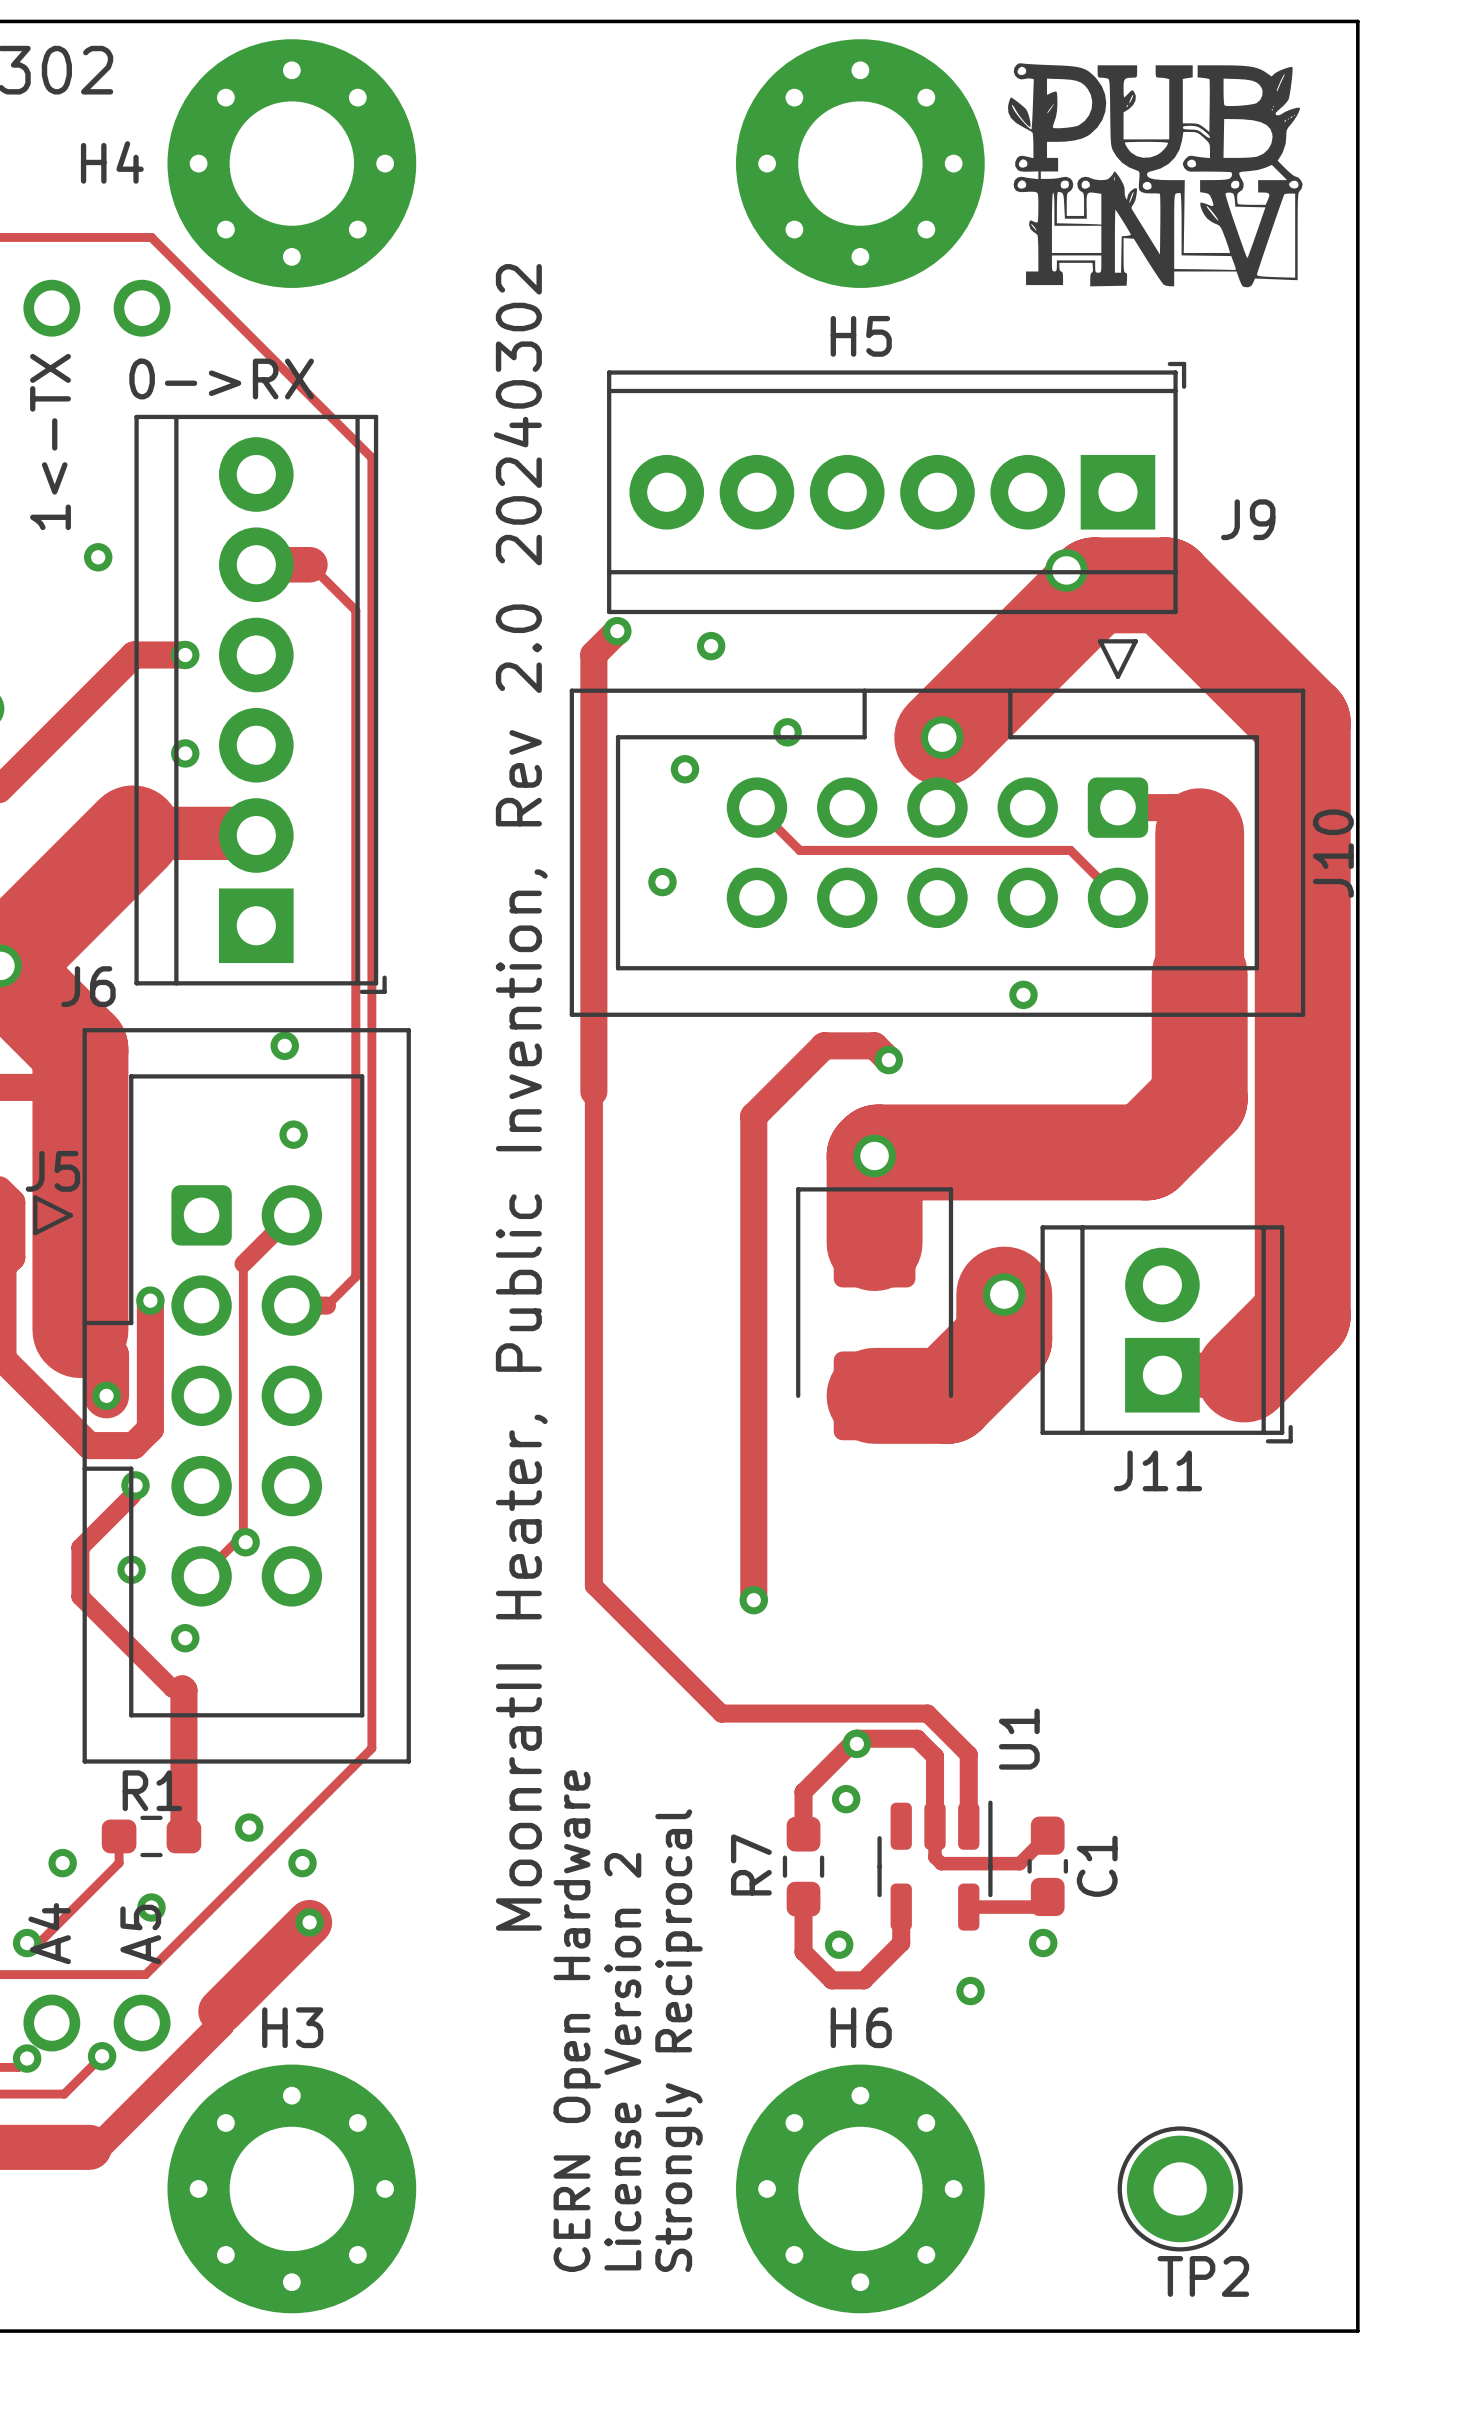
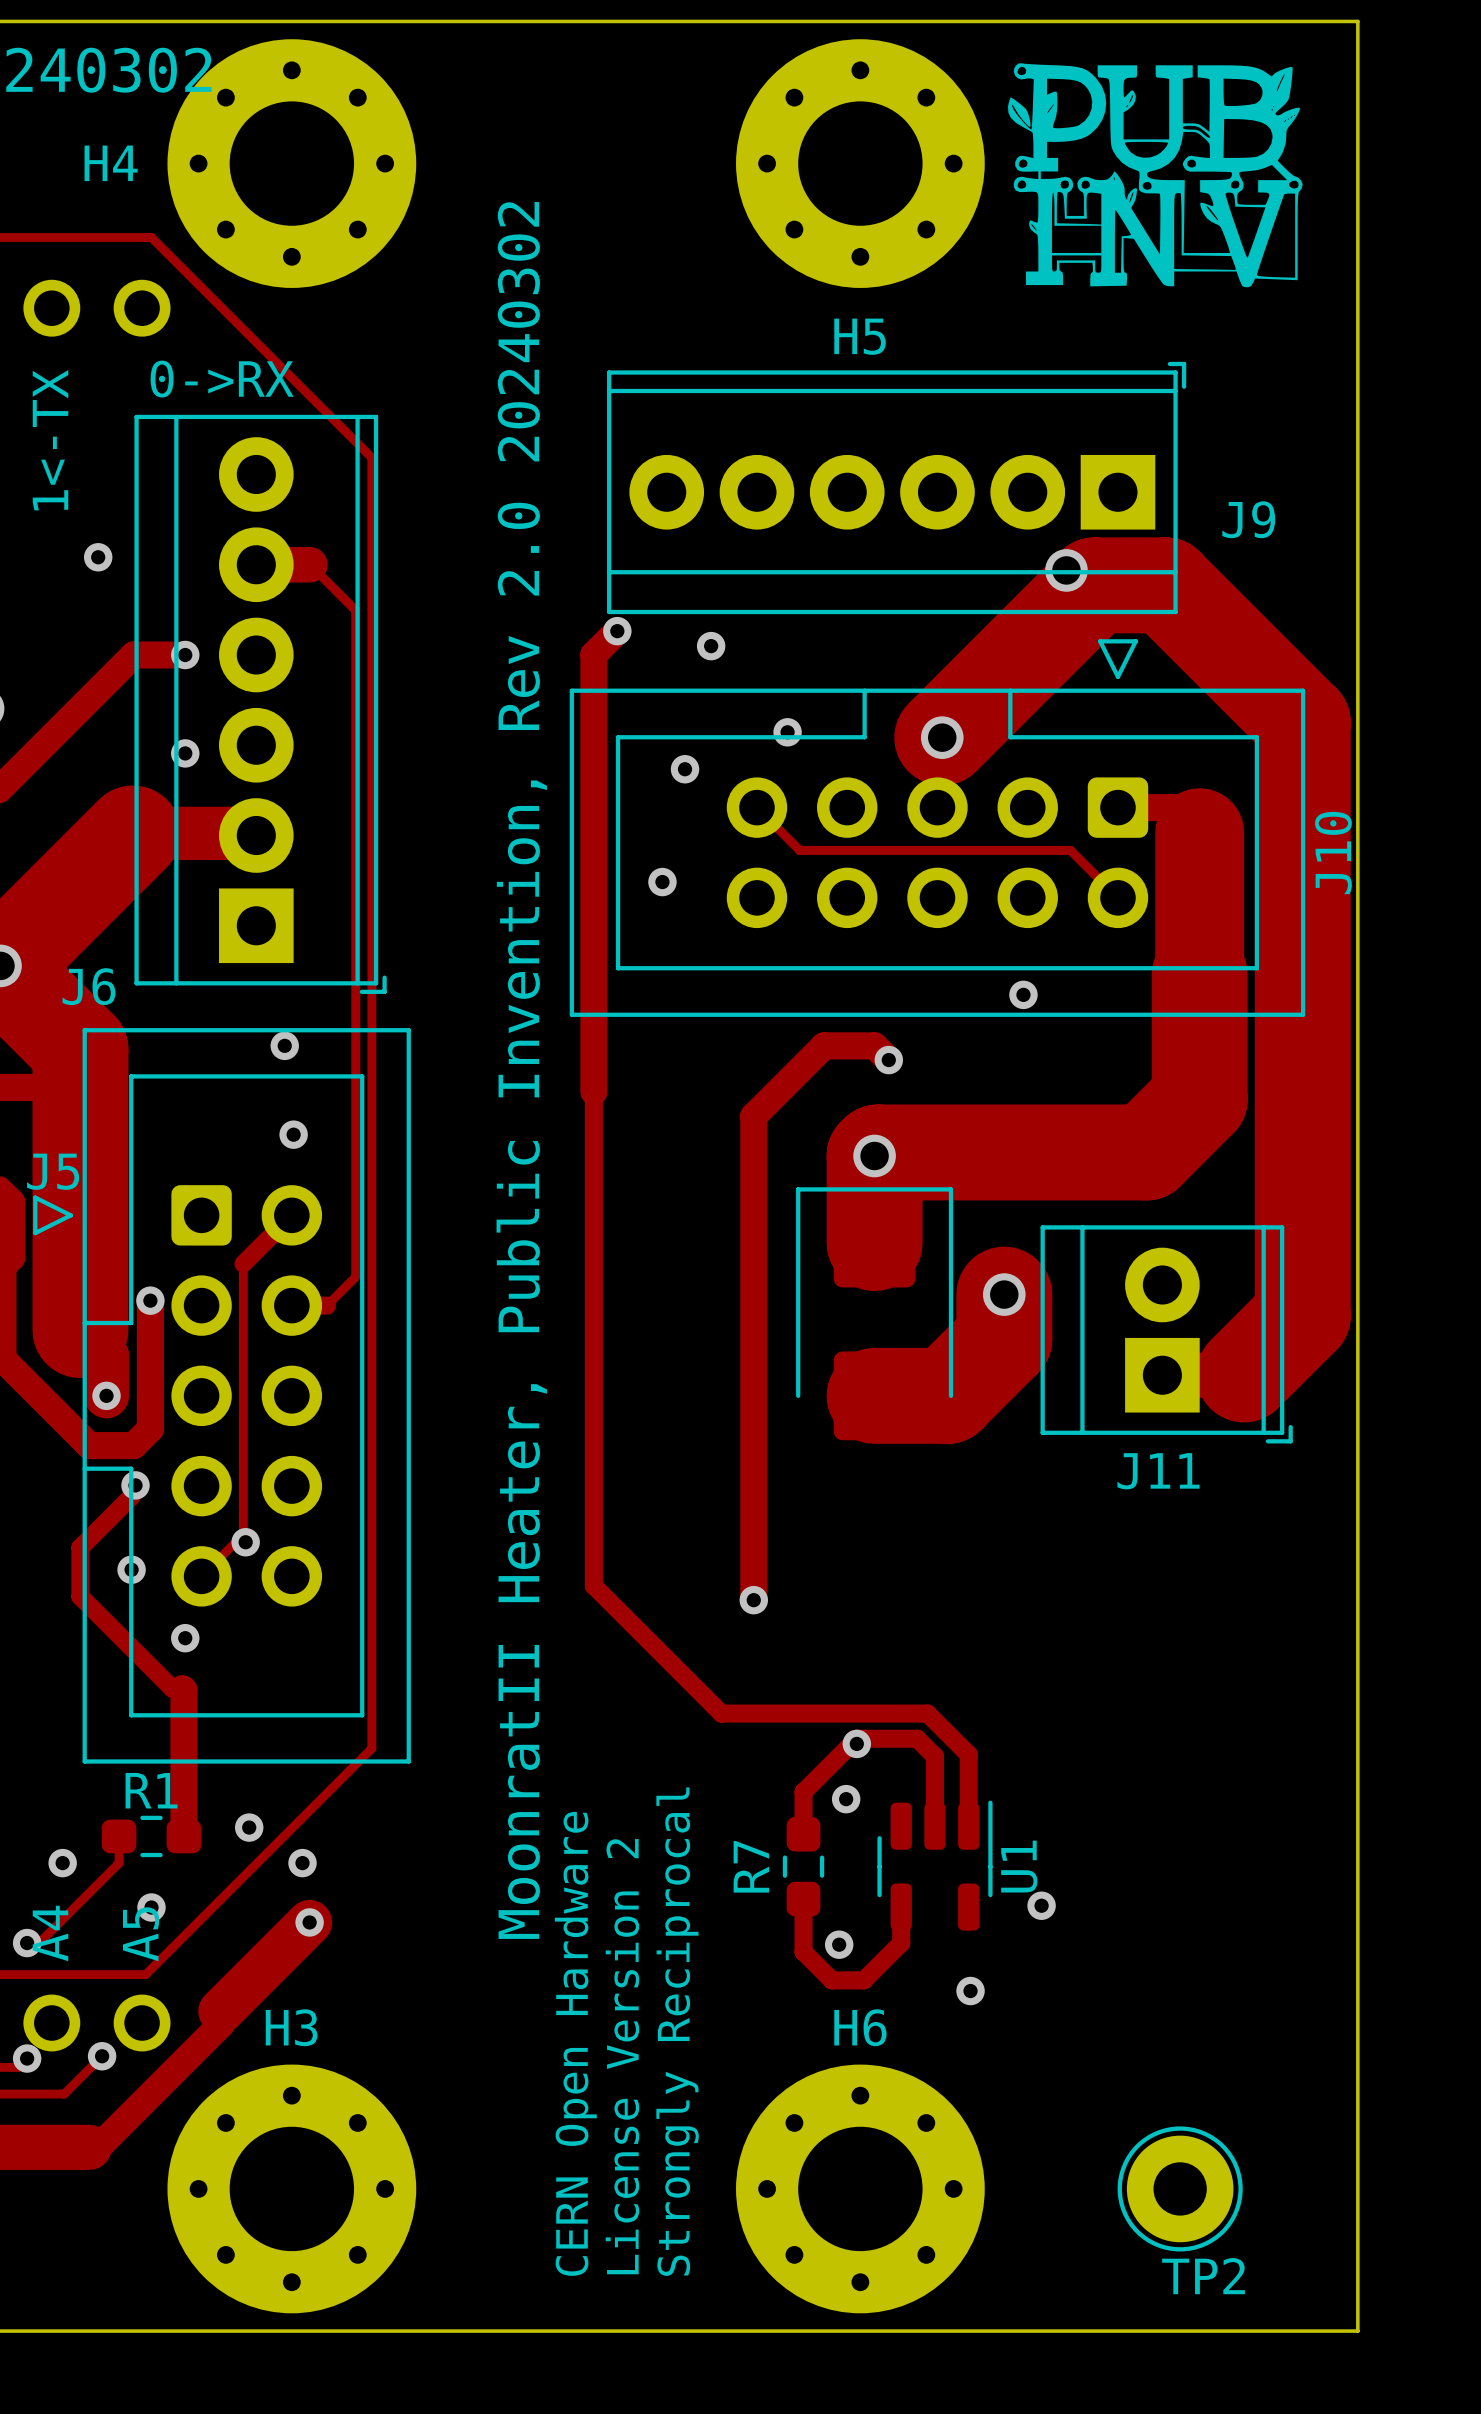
U1 name position: U1 (1019, 1739) -> U1 (1019, 1866)
track: (934, 1826) (934, 1857) (941, 1863) (1019, 1863) (1047, 1835) -> none
C1: (1047, 1866) -> none
track: (1047, 1896) (1037, 1907) (968, 1907) -> none
via position: (1043, 1943) -> (1041, 1905)

